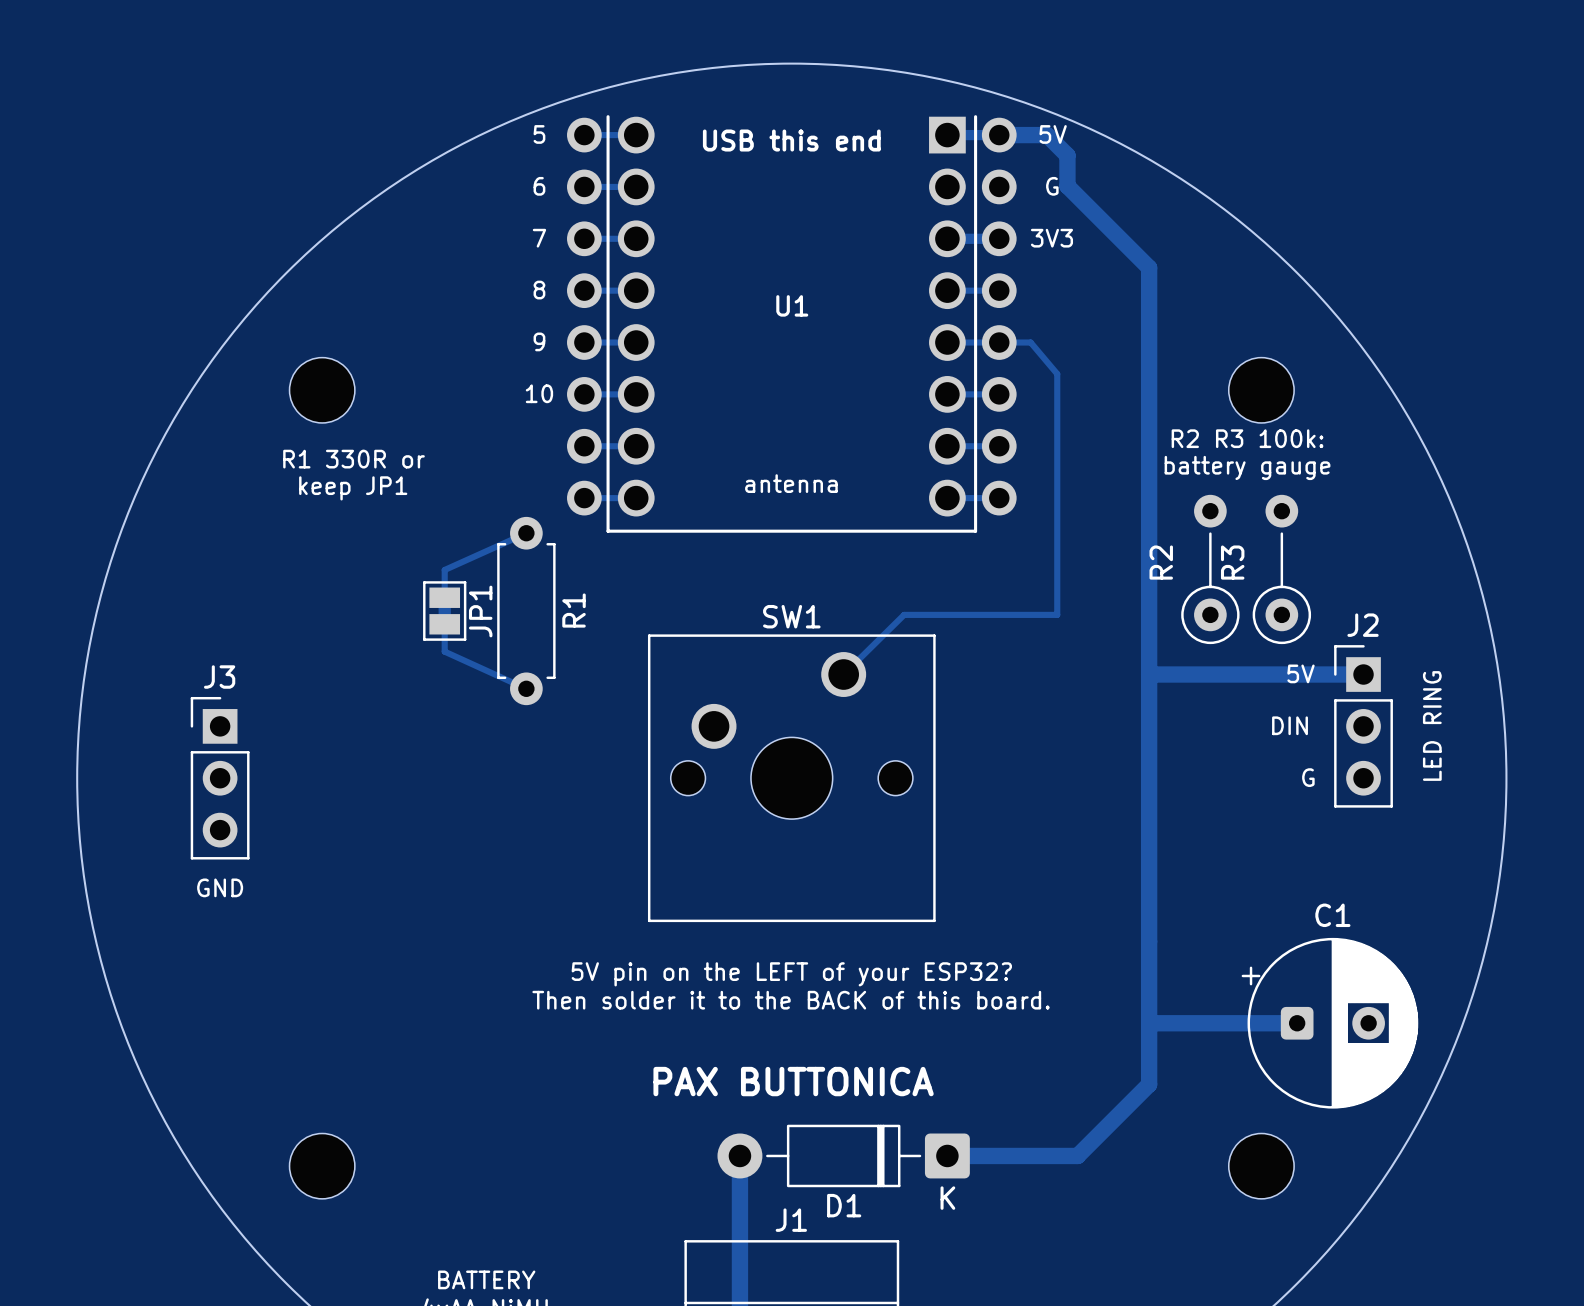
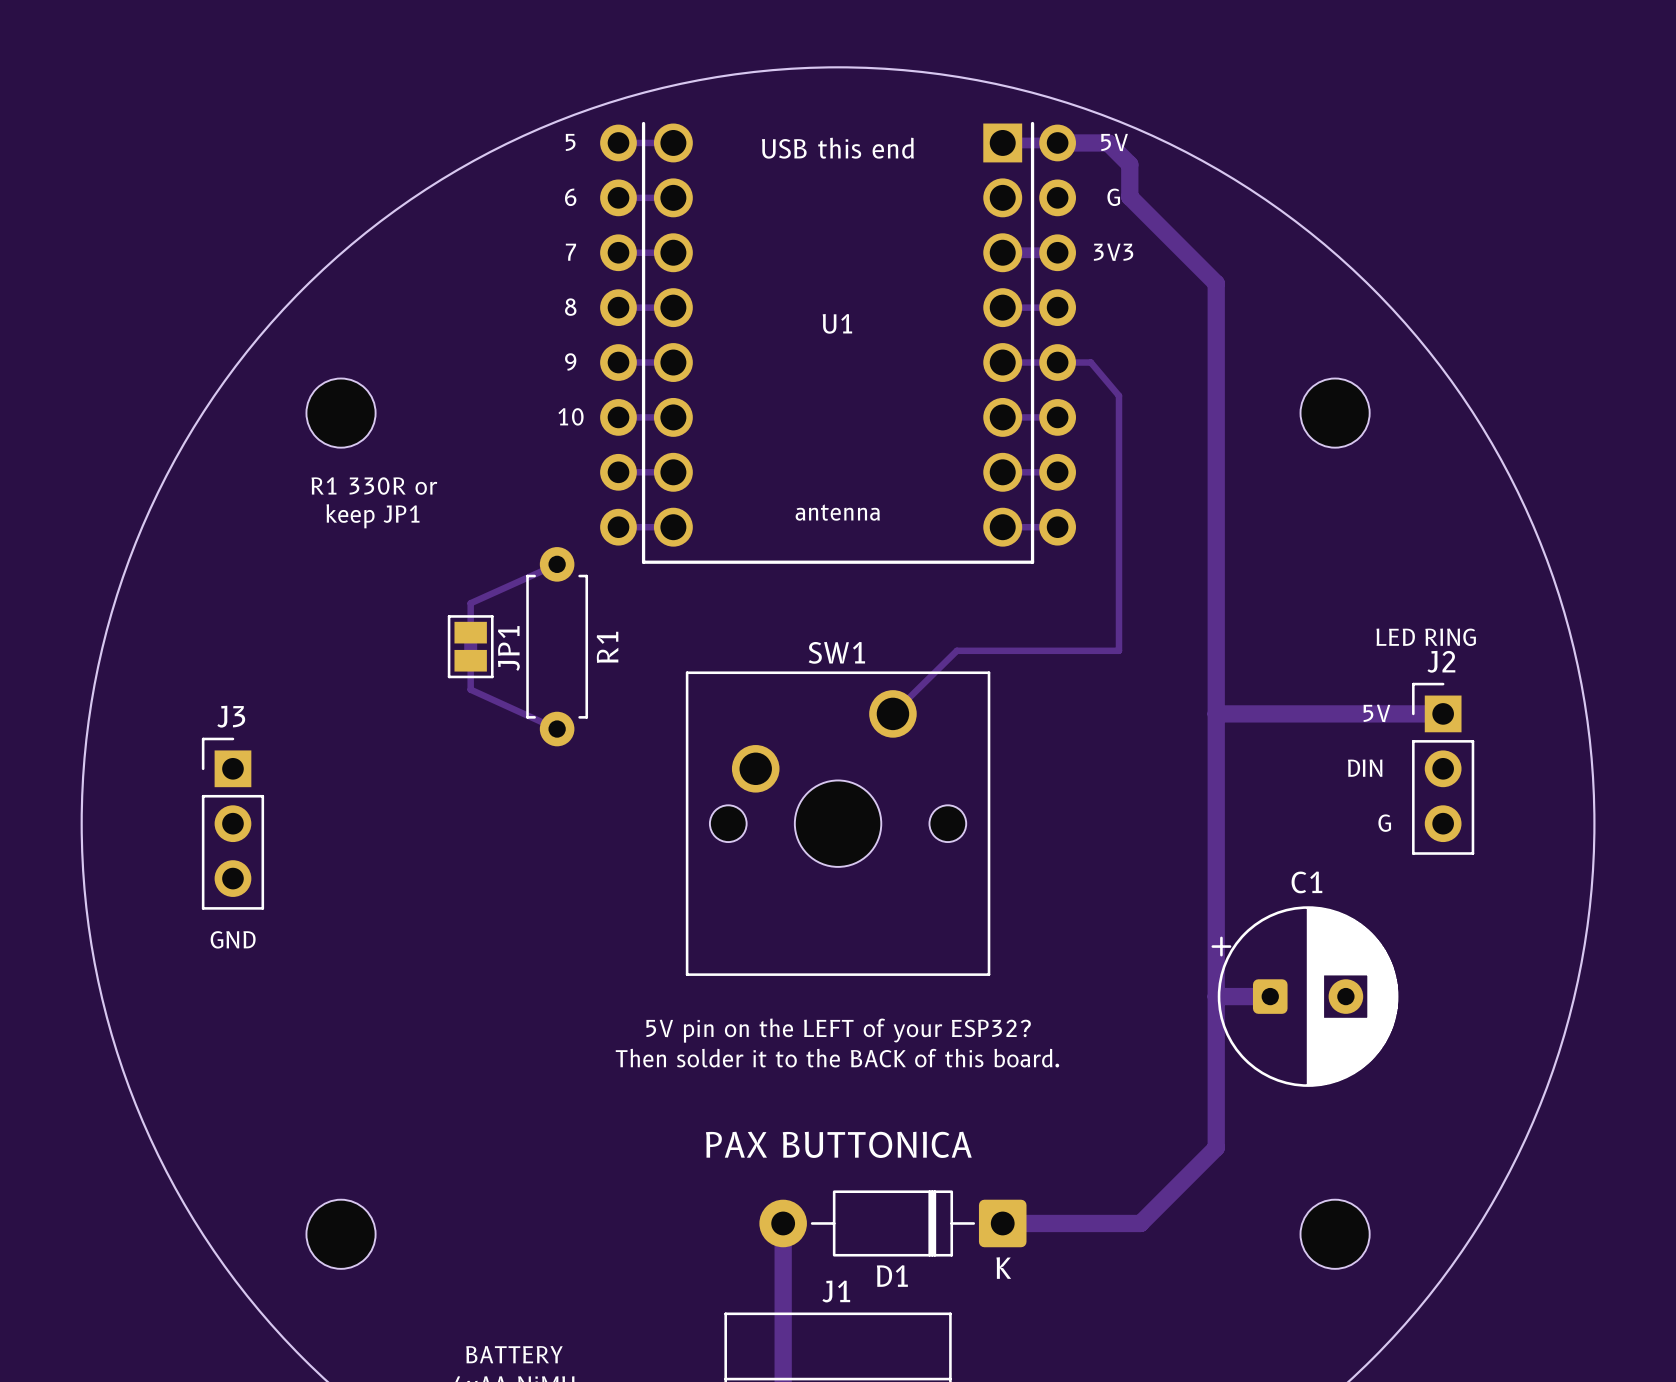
text: R2 R3 100k: (1247, 438) -> none
text: battery gauge (1247, 467) -> none
R2: (1210, 569) -> none
R3: (1281, 569) -> none
text rotation: 0° (1432, 725) -> 90° clockwise (1426, 637)
text position: LED RING (1432, 725) -> LED RING (1426, 637)
track: none -> (1216, 996) (1270, 996)
track: (1149, 1023) (1297, 1023) -> none
C1 position: (1329, 1023) -> (1304, 996)

